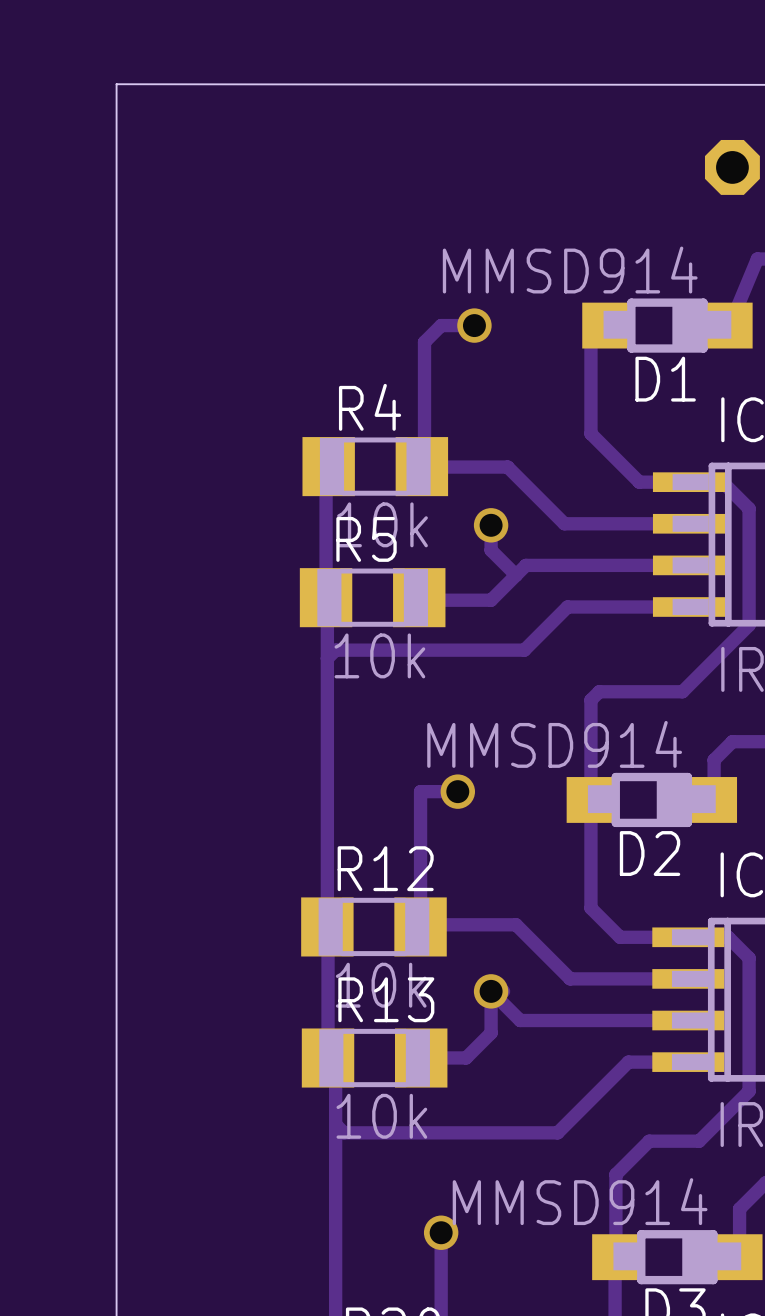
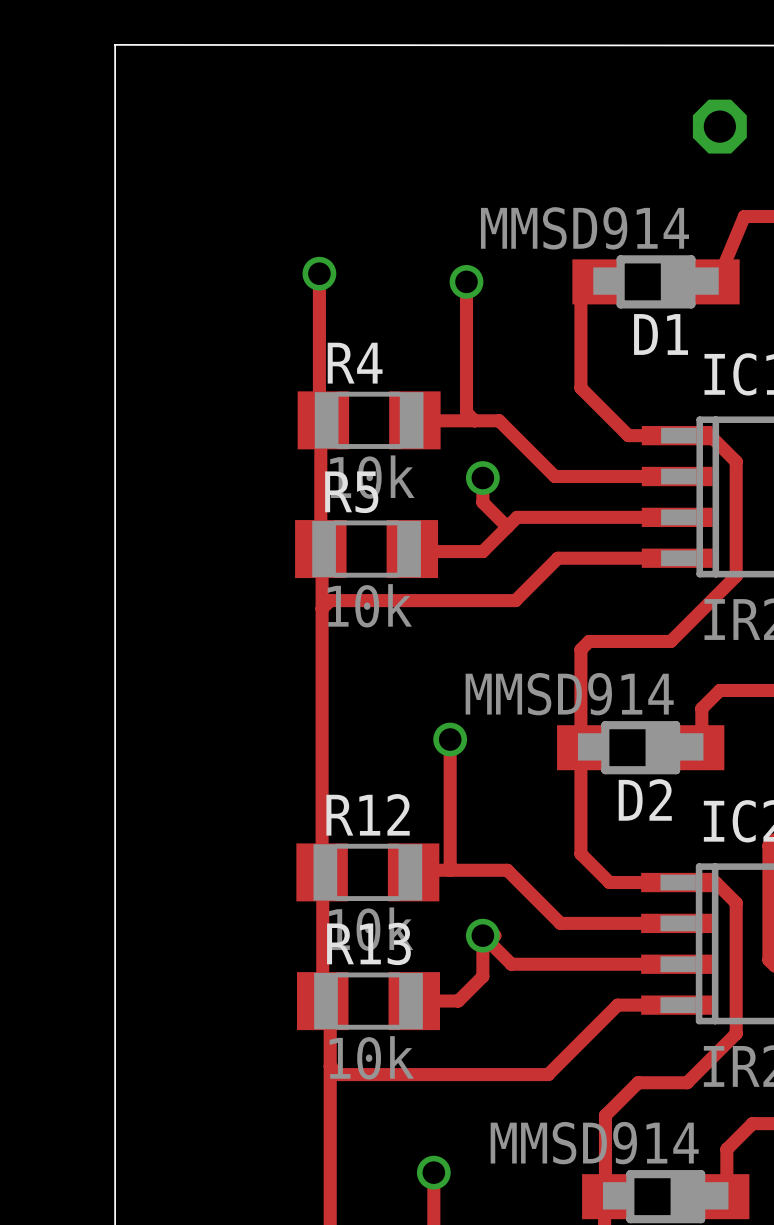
track: none -> (319, 273) (319, 416) (323, 420)
via: none -> (319, 273)
track: (474, 325) (441, 325) (424, 342) (424, 463) (421, 466) -> (466, 281) (466, 412) (474, 420)
track: (457, 791) (420, 791) (420, 926) -> (450, 739) (450, 870)

